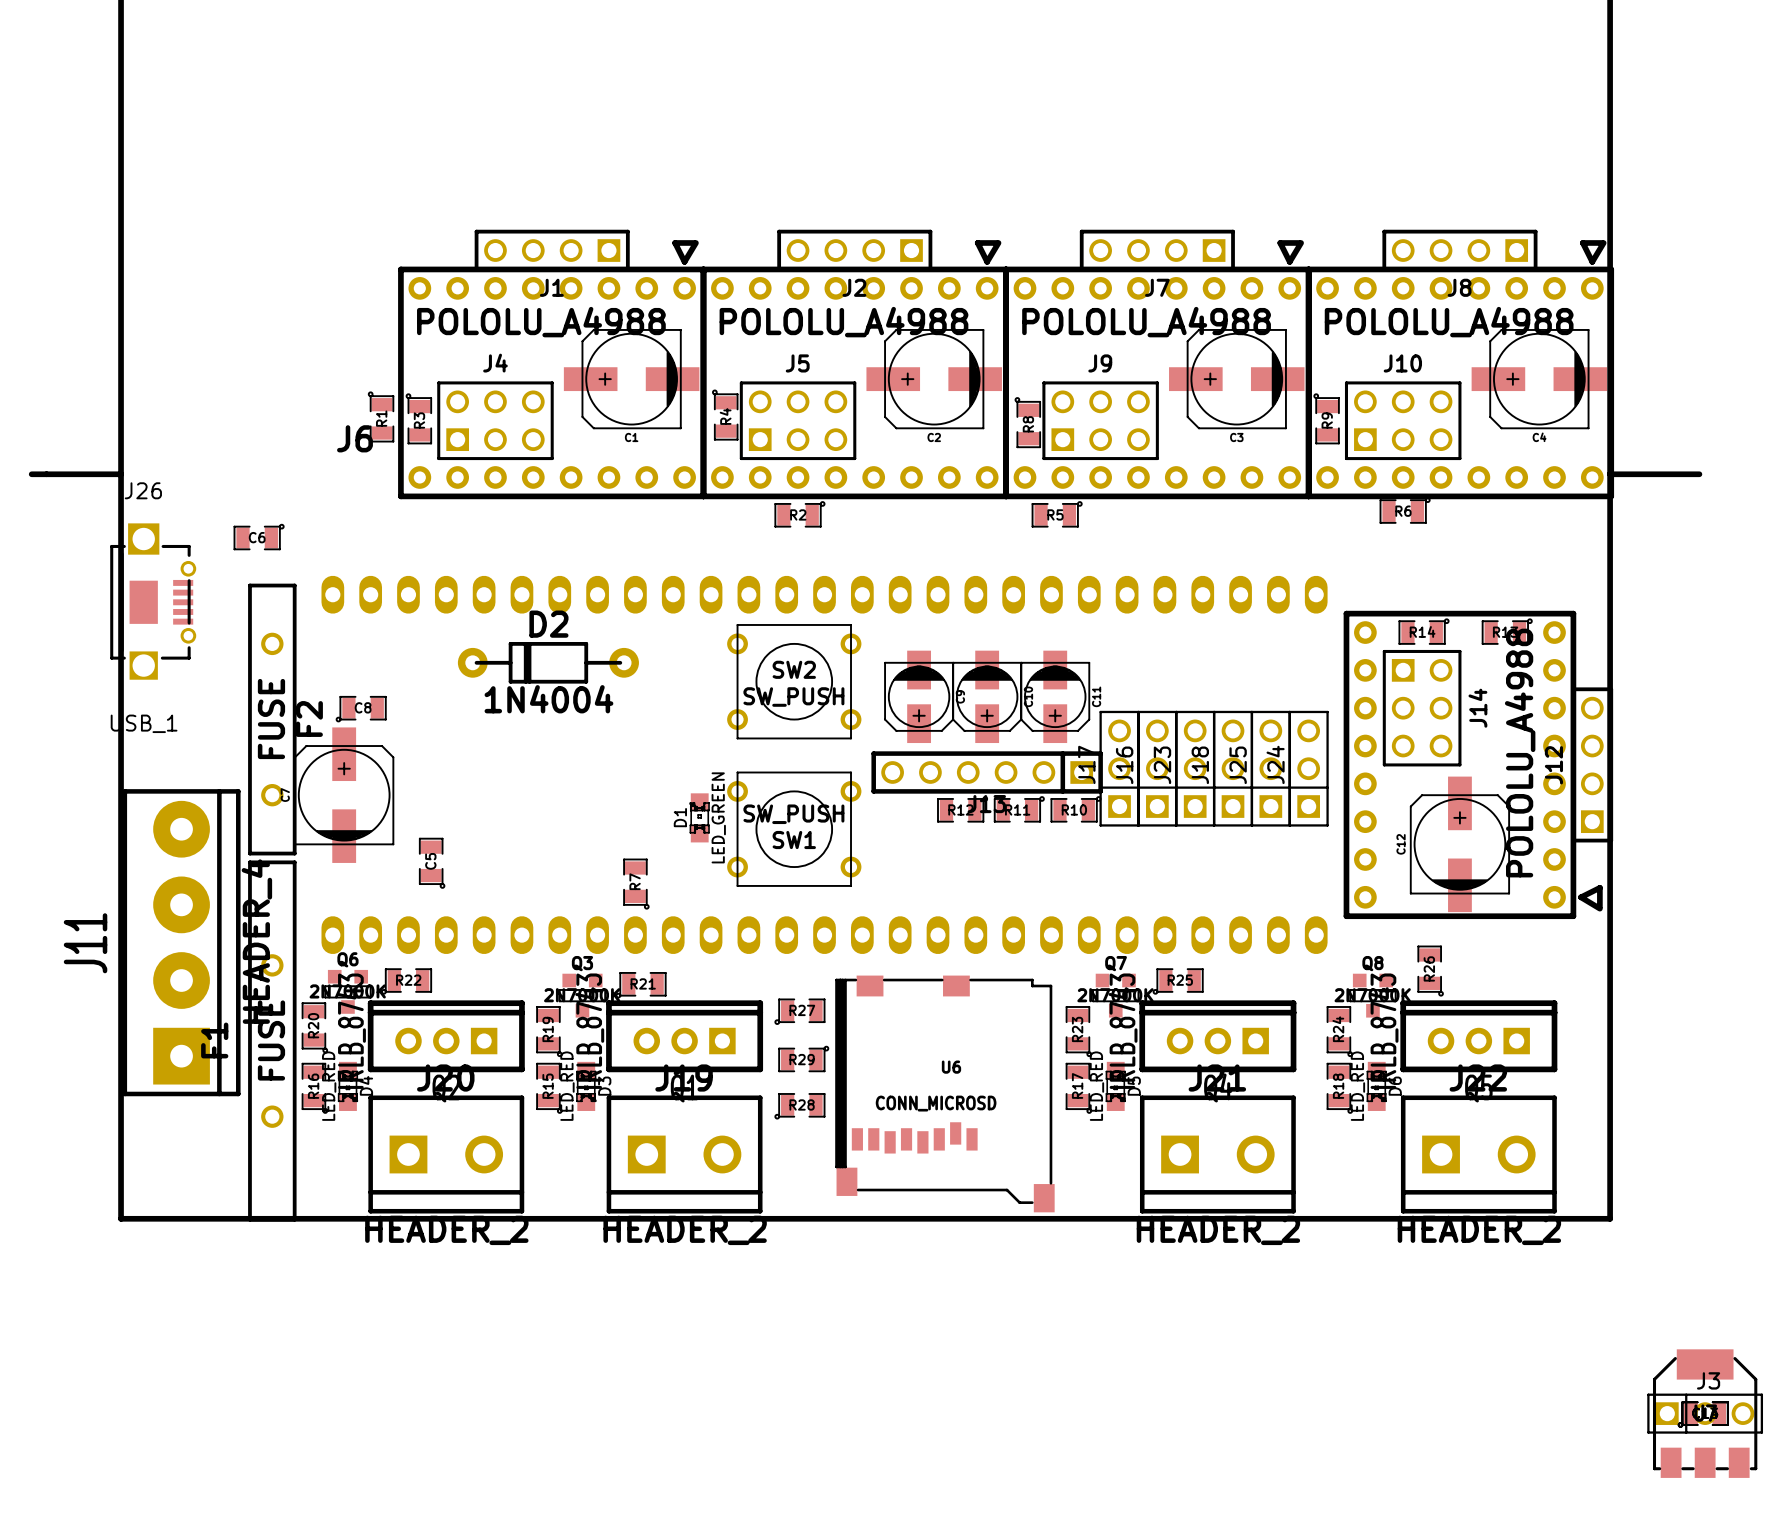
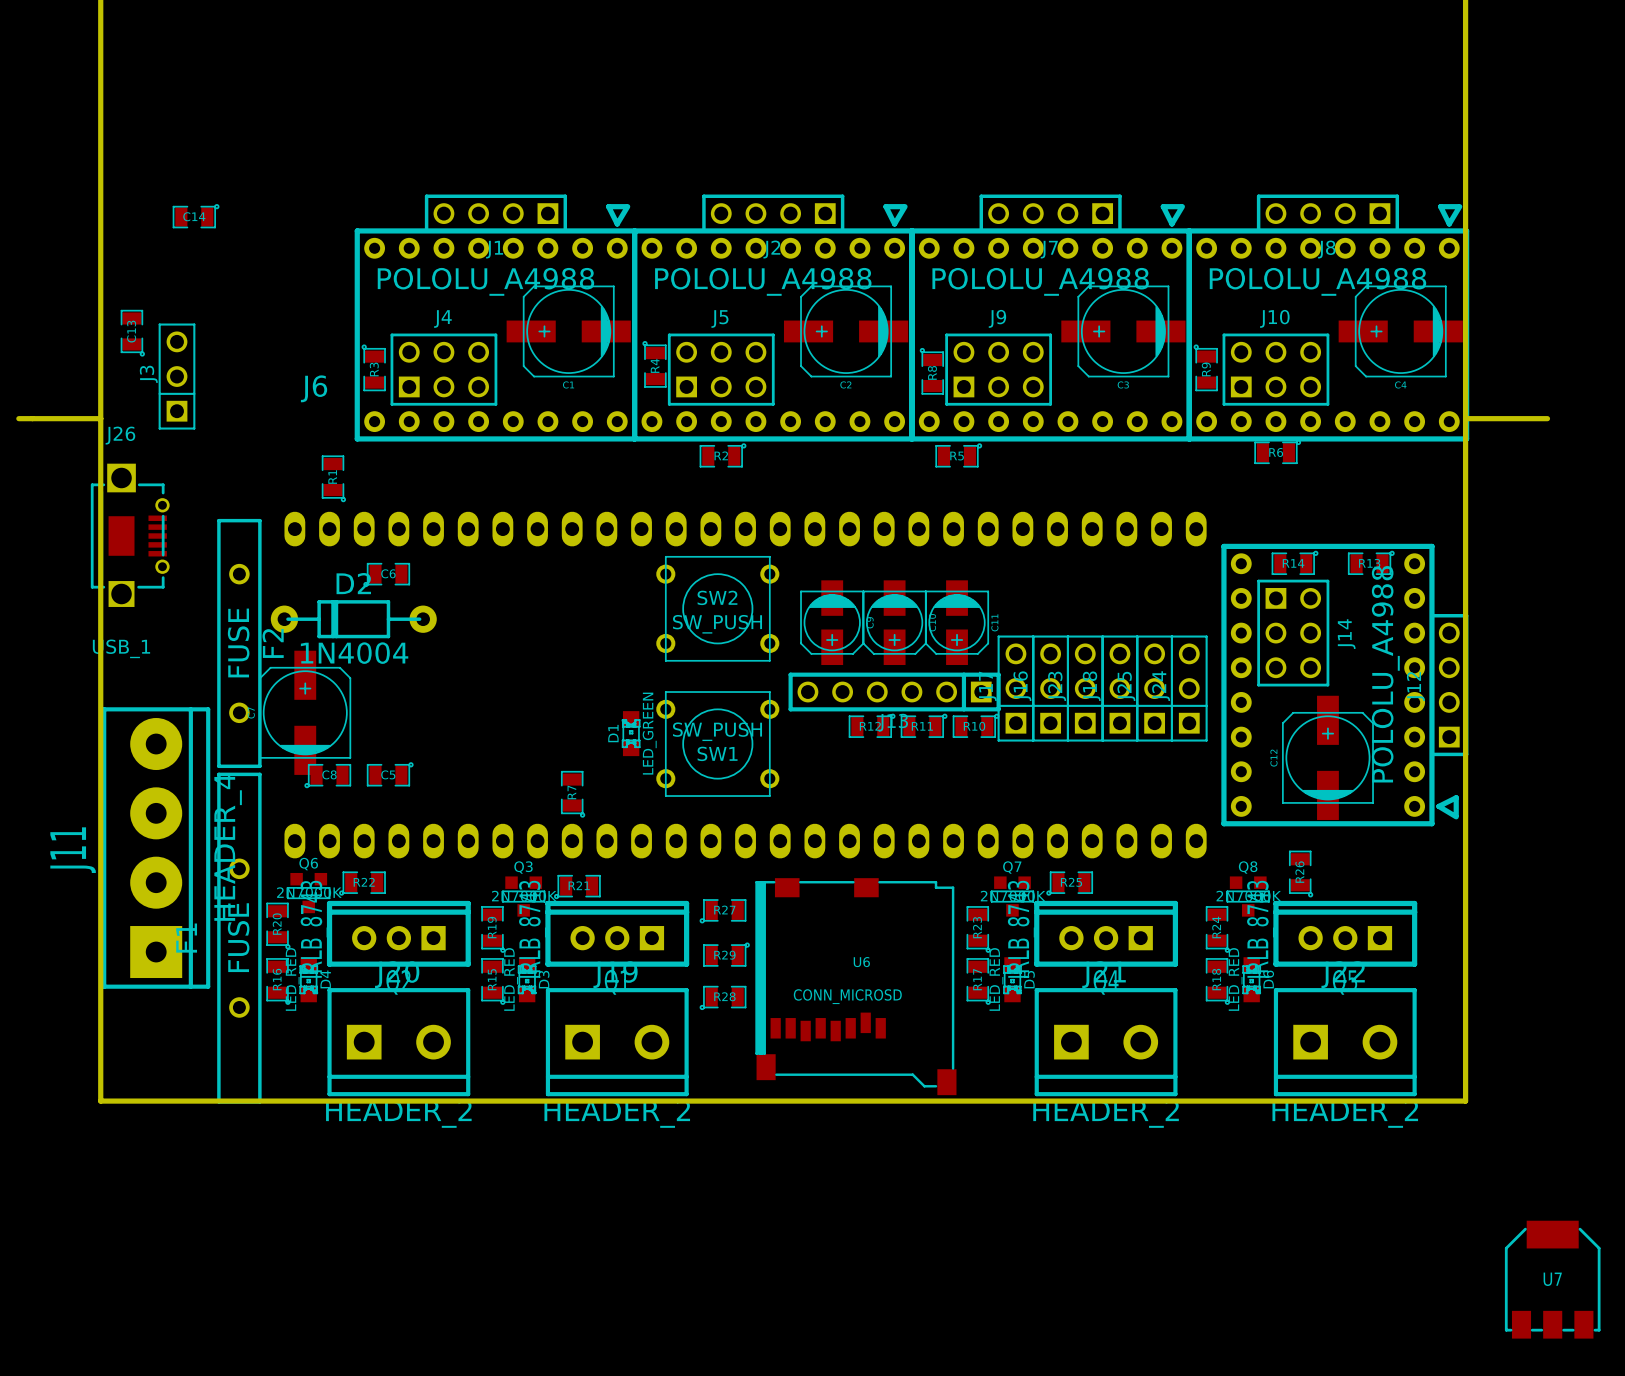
R1 rotation: 0° (381, 416) -> 180° (333, 478)
R1 position: (381, 416) -> (333, 478)
C6 rotation: 0° (259, 537) -> 180° (386, 575)
C6 position: (259, 537) -> (386, 575)
D2 position: (548, 662) -> (353, 619)
C8 position: (361, 709) -> (327, 776)
C5 rotation: 0° (432, 863) -> 90° counterclockwise (390, 774)
J3 rotation: 0° (1705, 1413) -> 90° counterclockwise (177, 376)
J3 position: (1705, 1413) -> (177, 376)
C13 rotation: 0° (1703, 1414) -> 90° counterclockwise (132, 333)
C13 position: (1703, 1414) -> (132, 333)
C14 rotation: 0° (1703, 1414) -> 180° (196, 216)
C14 position: (1703, 1414) -> (196, 216)

